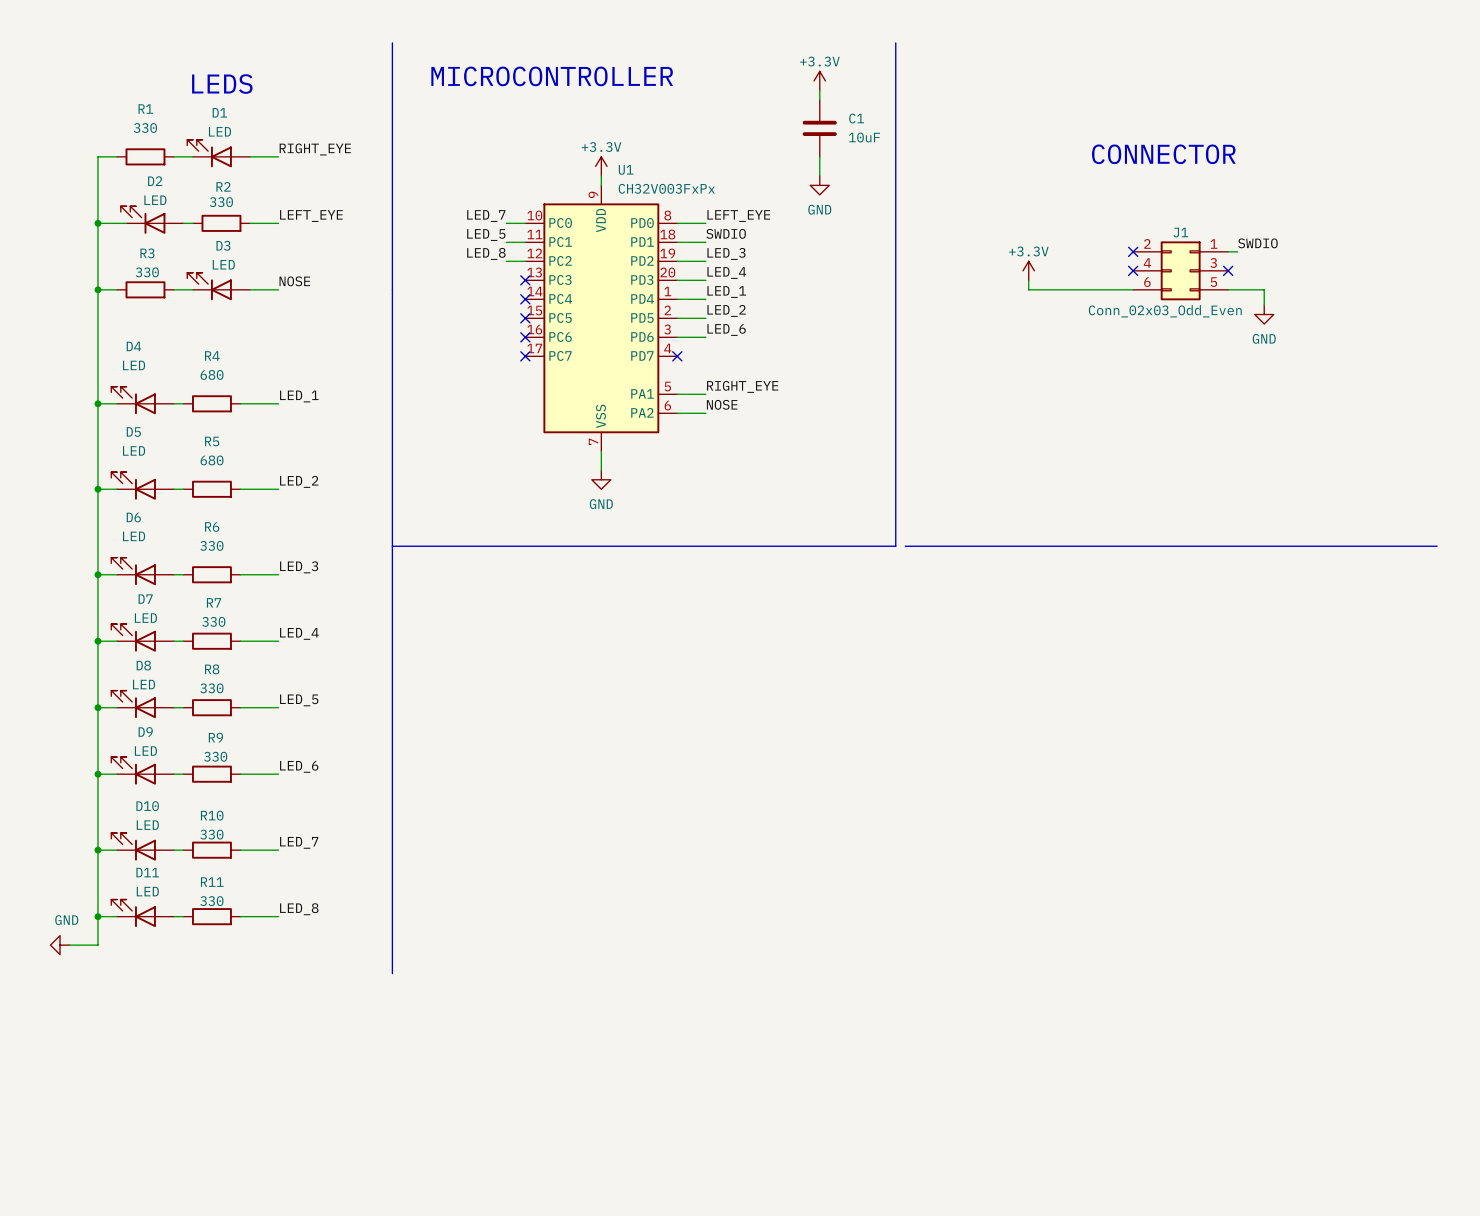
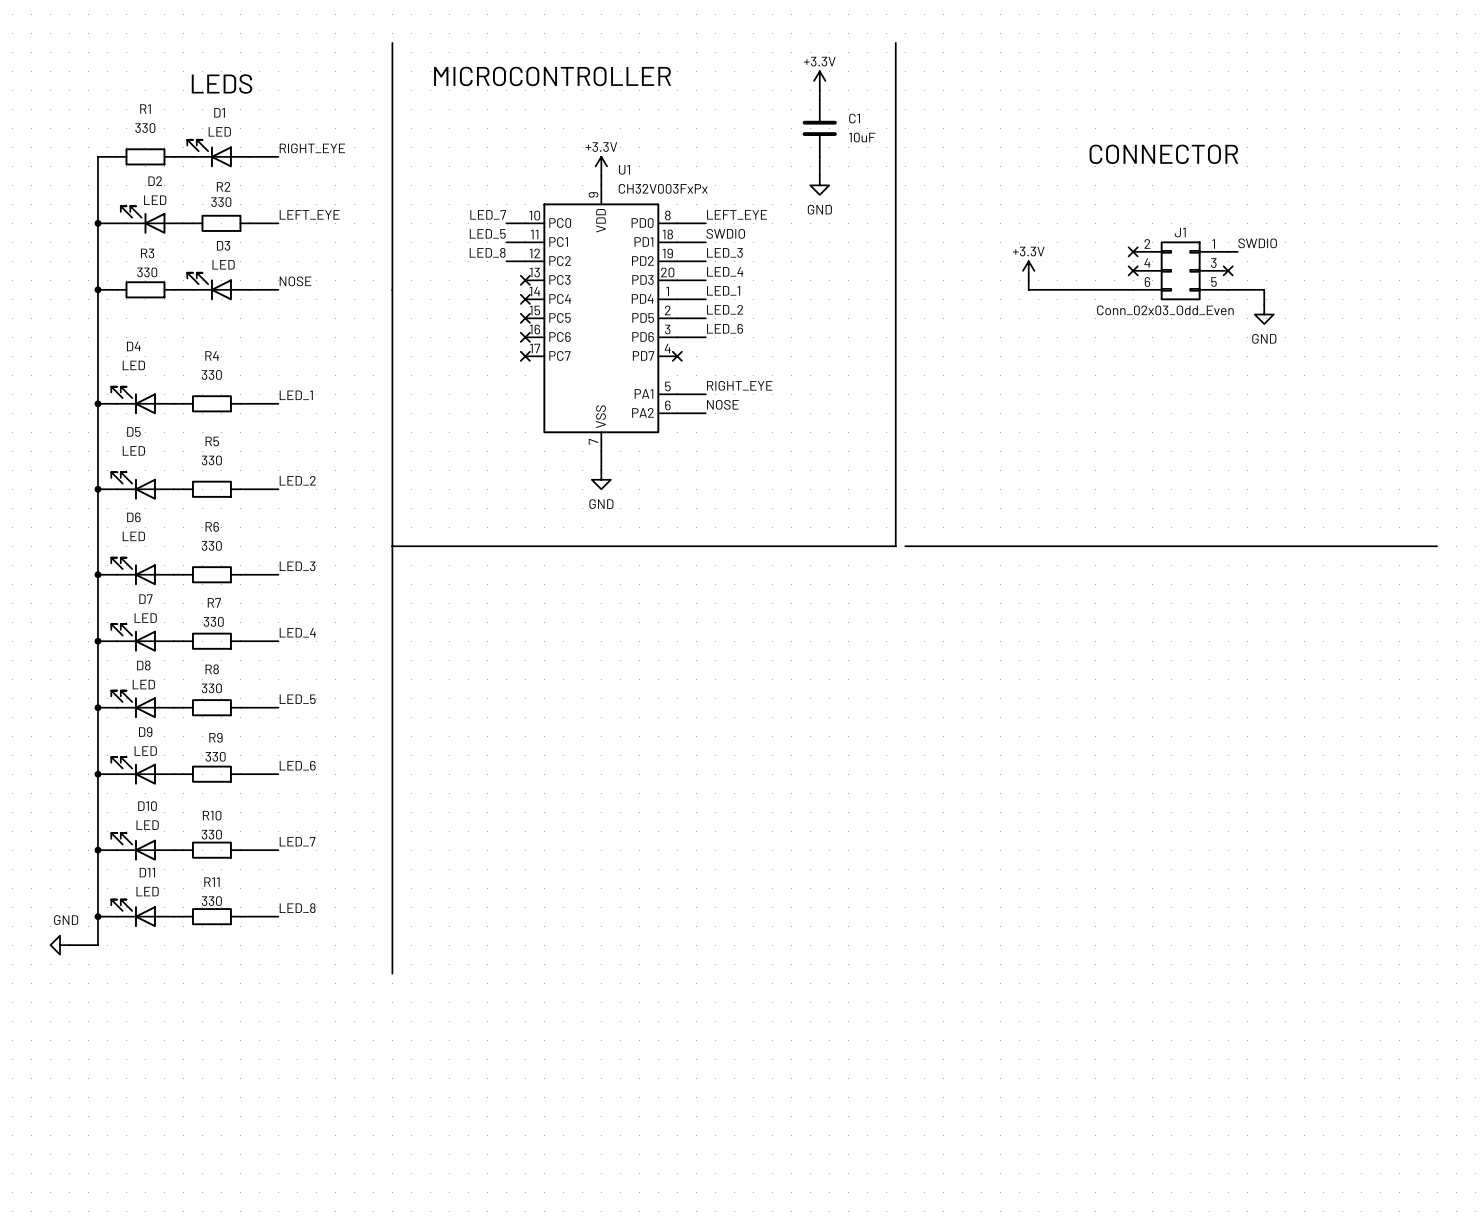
R4 value: 680 (212, 374) -> 330 (211, 374)
R5 value: 680 (212, 460) -> 330 (211, 460)

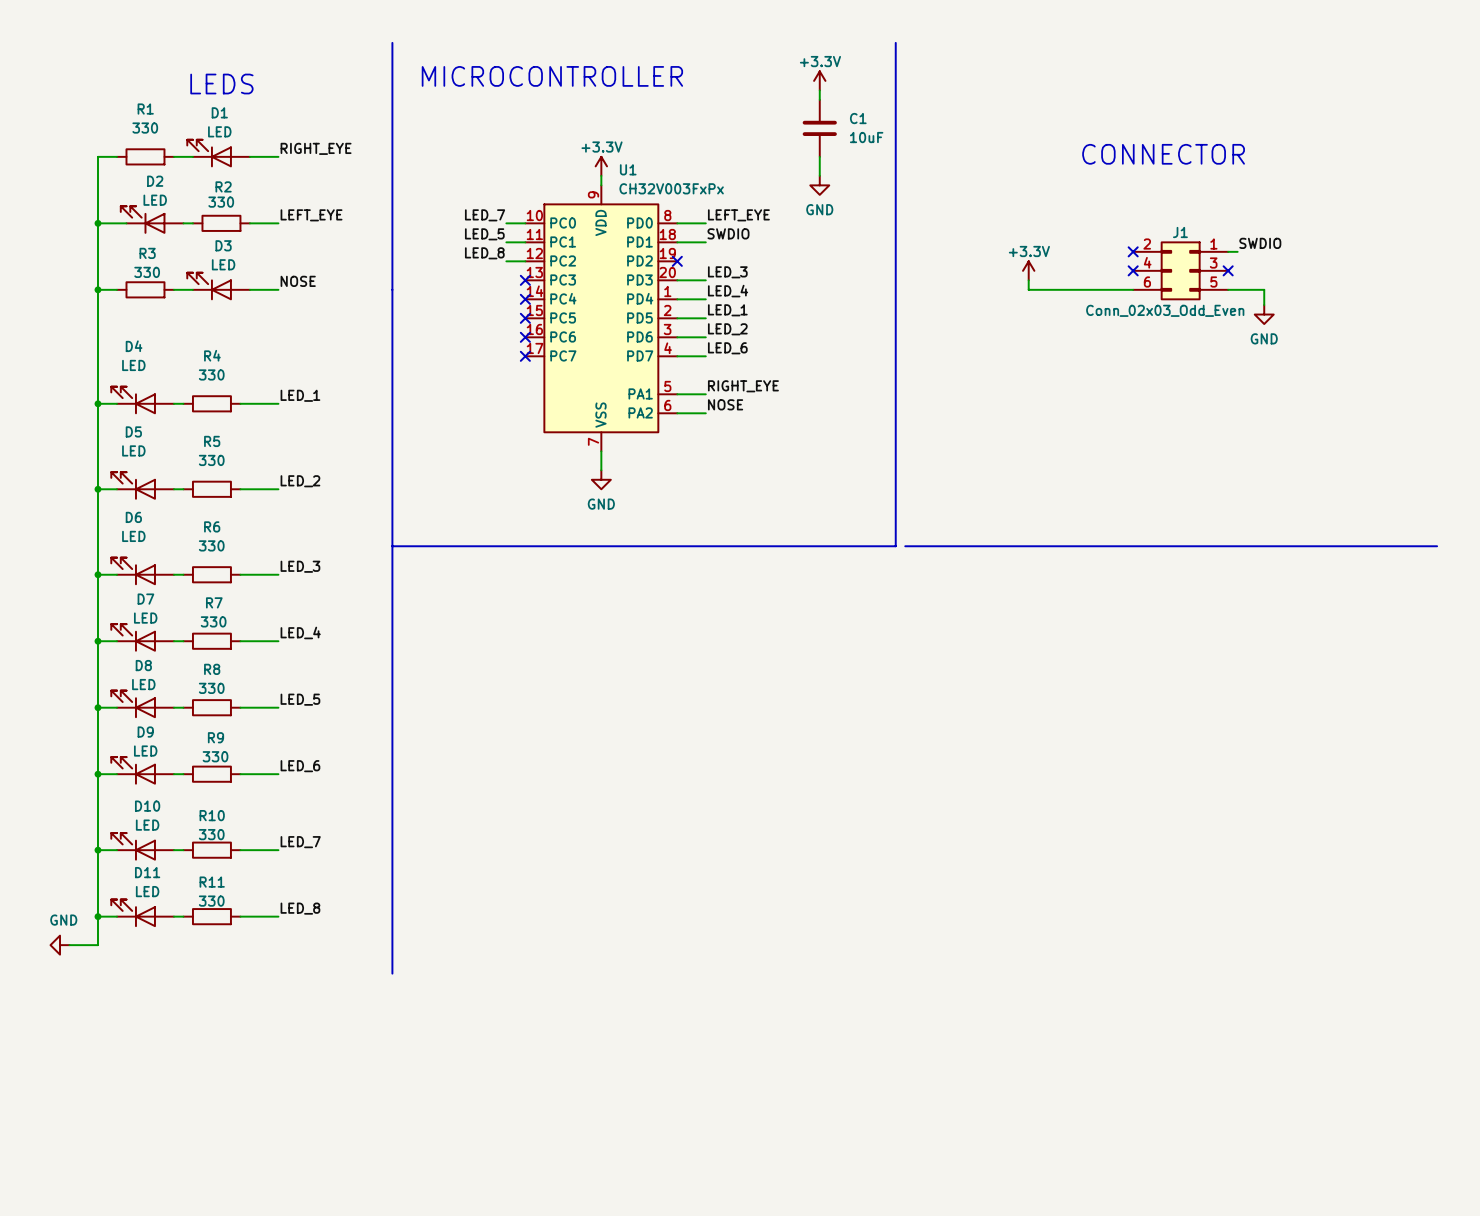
label: LED_3 (724, 252) -> none
wire: (677, 261) (705, 261) -> (677, 356) (705, 356)
no-connect mark: none -> (677, 261)
label: LED_4 (725, 271) -> LED_3 (727, 272)
label: LED_1 (723, 290) -> LED_4 (728, 291)
label: LED_2 (725, 309) -> LED_1 (727, 310)
label: LED_6 (725, 328) -> LED_2 (727, 329)
label: none -> LED_6 (727, 348)
no-connect mark: (677, 356) -> none

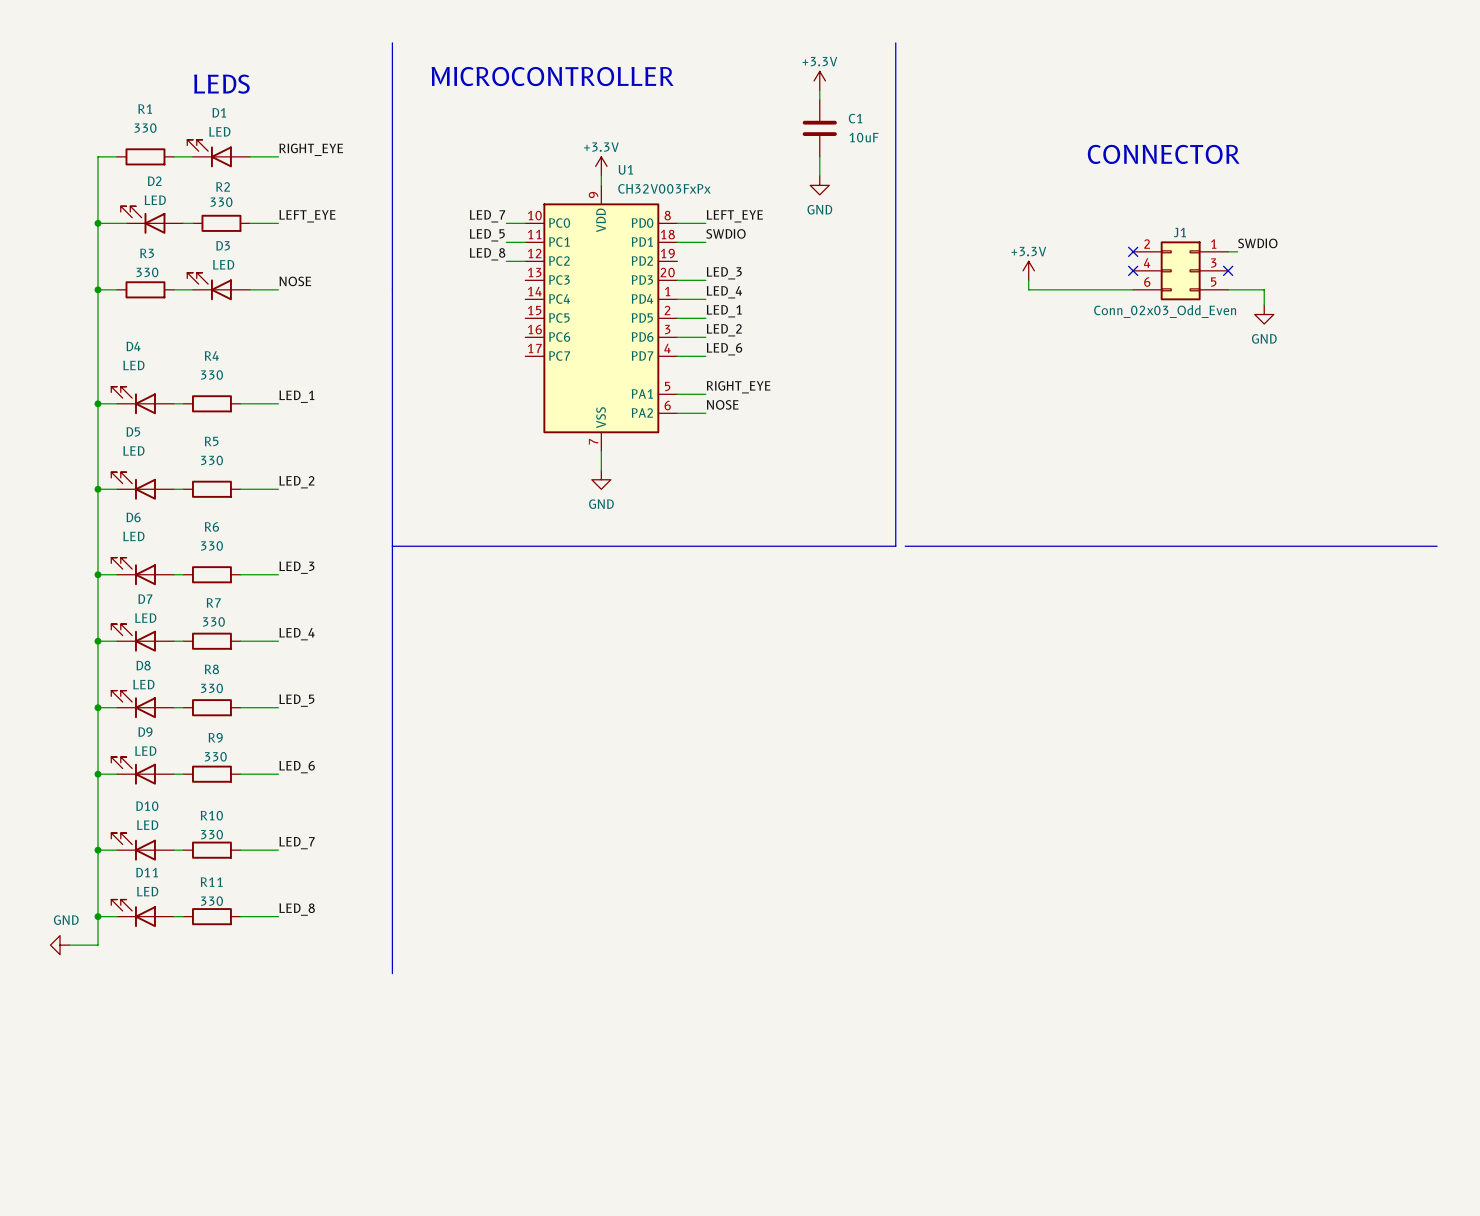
no-connect mark: (677, 261) -> none
no-connect mark: (525, 280) -> none
no-connect mark: (525, 299) -> none
no-connect mark: (525, 318) -> none
no-connect mark: (525, 337) -> none
no-connect mark: (525, 356) -> none

